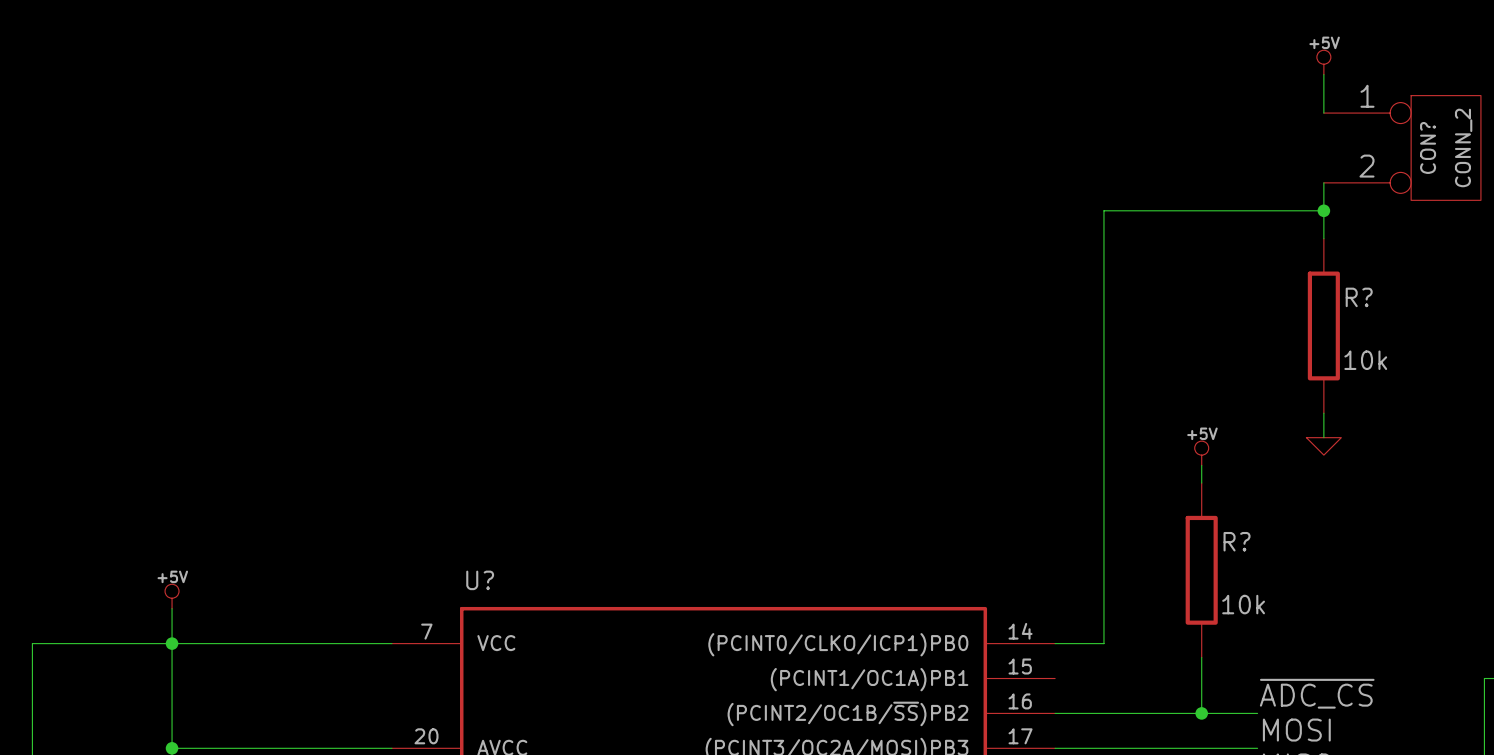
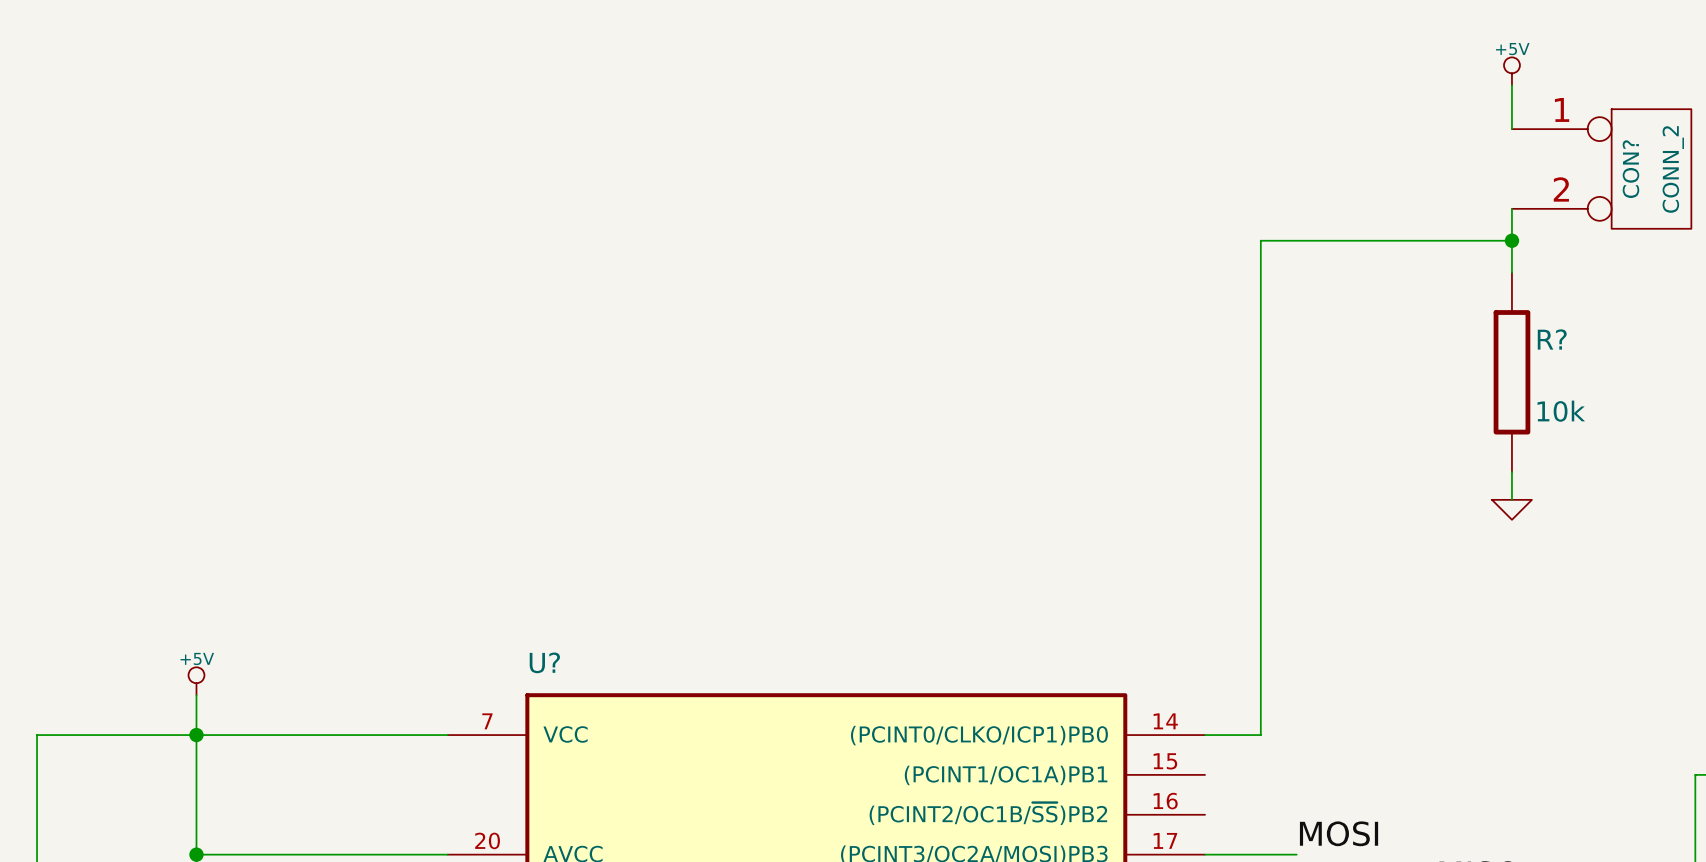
power symbol: +5V (1201, 453) -> none
wire: (1201, 465) (1201, 483) -> none
R?: 10k (1201, 570) -> none
wire: (1201, 657) (1201, 713) -> none
label: ~{ADC_CS} (1317, 693) -> none
wire: (1055, 713) (1257, 713) -> none
junction: (1201, 713) -> none
label position: MOSI (1296, 730) -> MOSI (1339, 833)
wire: (1135, 748) (1257, 748) -> none

